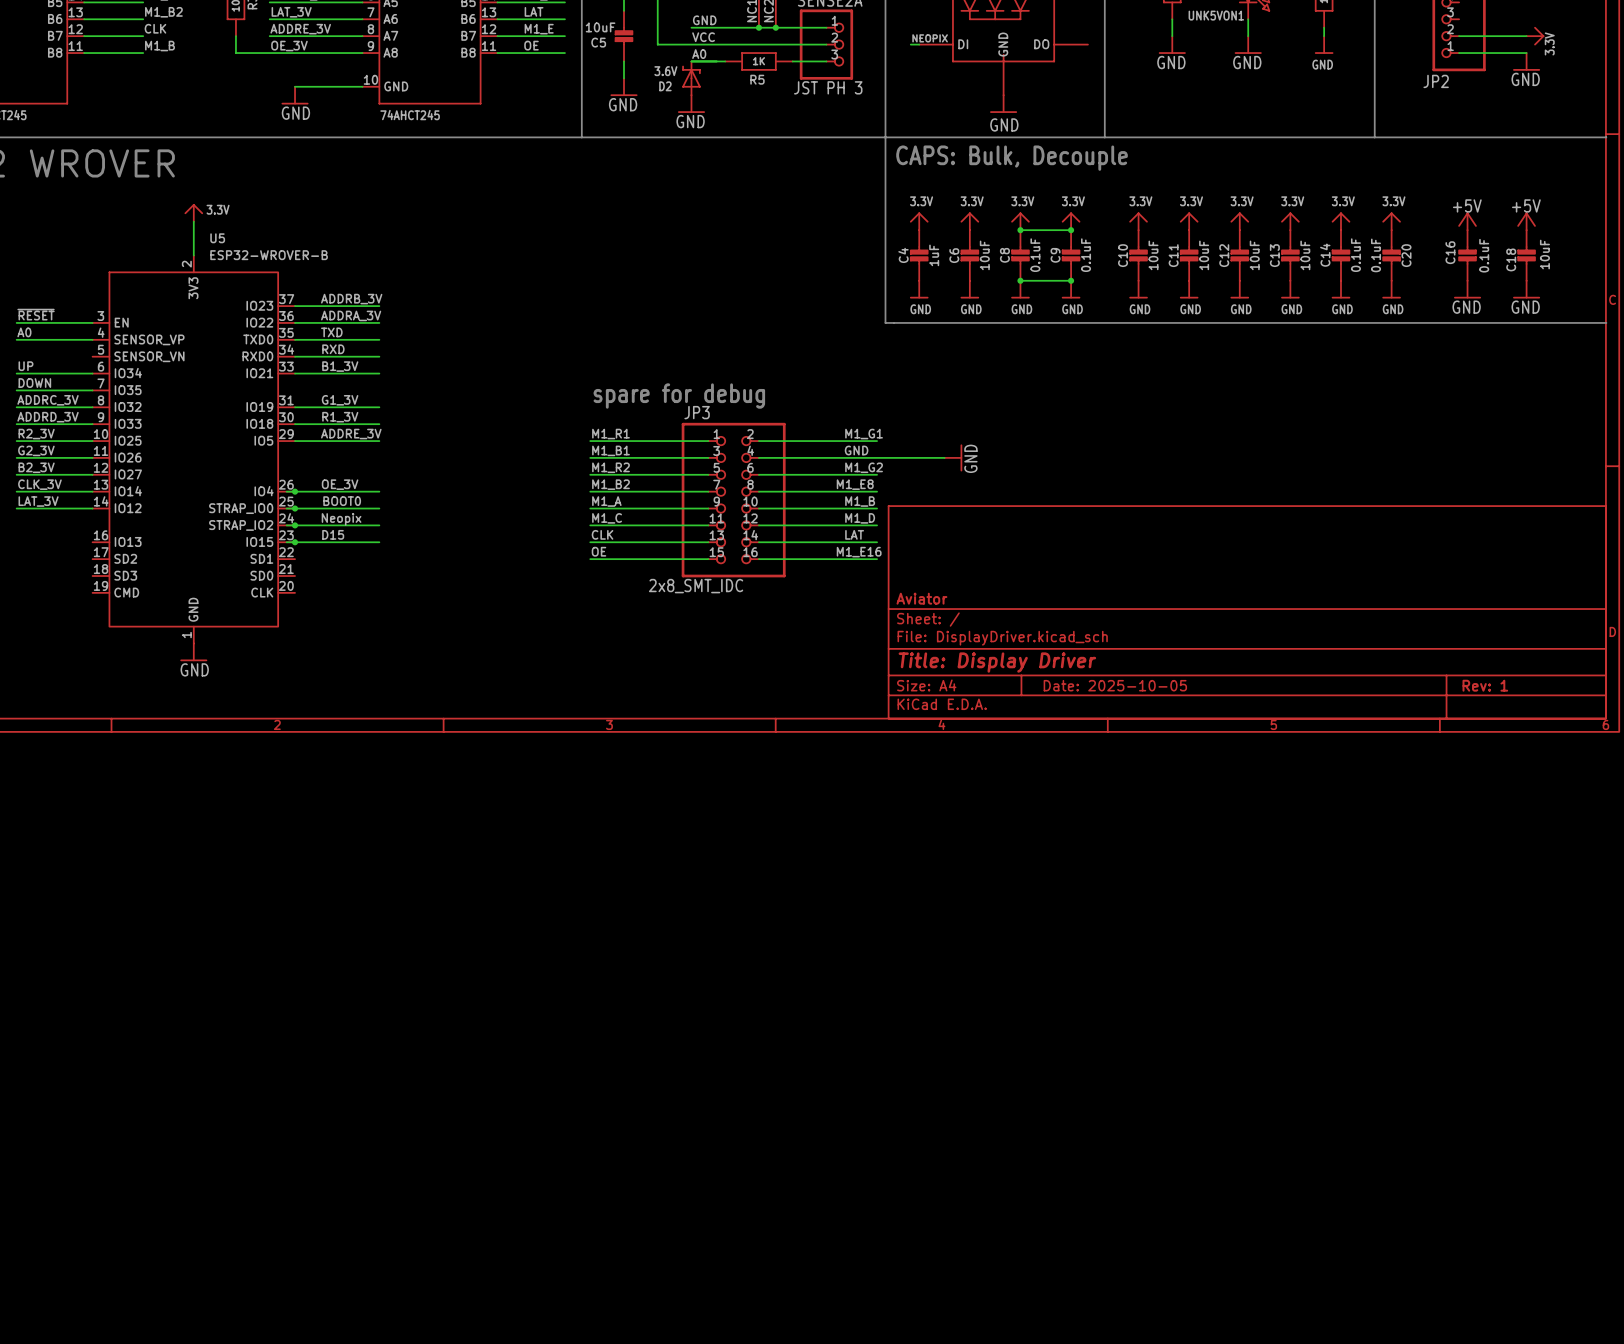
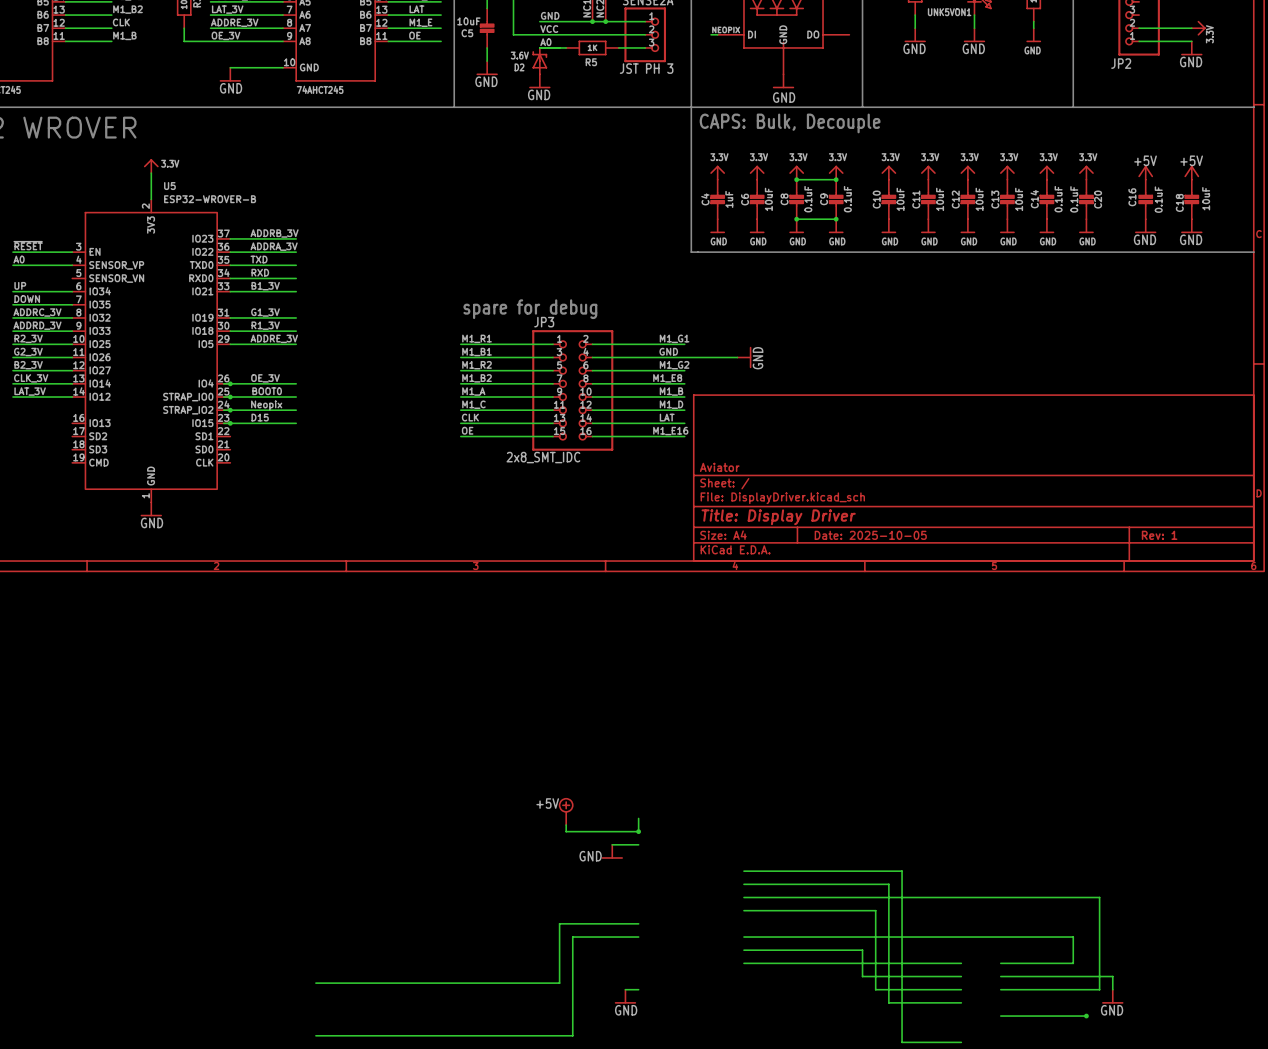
power symbol: none -> +5V (566, 811)
wire: none -> (638, 818) (638, 831) (566, 831) (566, 825)
junction: none -> (638, 831)
wire: none -> (612, 844) (638, 844)
power symbol: none -> GND (612, 851)
wire: none -> (743, 871) (902, 871) (902, 1042) (961, 1042)
wire: none -> (743, 884) (888, 884) (888, 1002) (961, 1002)
wire: none -> (743, 897) (1099, 897) (1099, 989) (1000, 989)
wire: none -> (743, 910) (875, 910) (875, 989) (961, 989)
wire: none -> (638, 923) (559, 923) (559, 983) (315, 983)
wire: none -> (638, 937) (572, 937) (572, 1035) (315, 1035)
wire: none -> (743, 937) (1073, 937) (1073, 963) (1000, 963)
wire: none -> (743, 950) (862, 950) (862, 976) (961, 976)
wire: none -> (743, 963) (961, 963)
wire: none -> (1000, 976) (1112, 976) (1112, 989)
wire: none -> (625, 989) (638, 989)
power symbol: none -> GND (625, 996)
power symbol: none -> GND (1112, 996)
wire: none -> (1000, 1016) (1086, 1016)
junction: none -> (1086, 1016)

